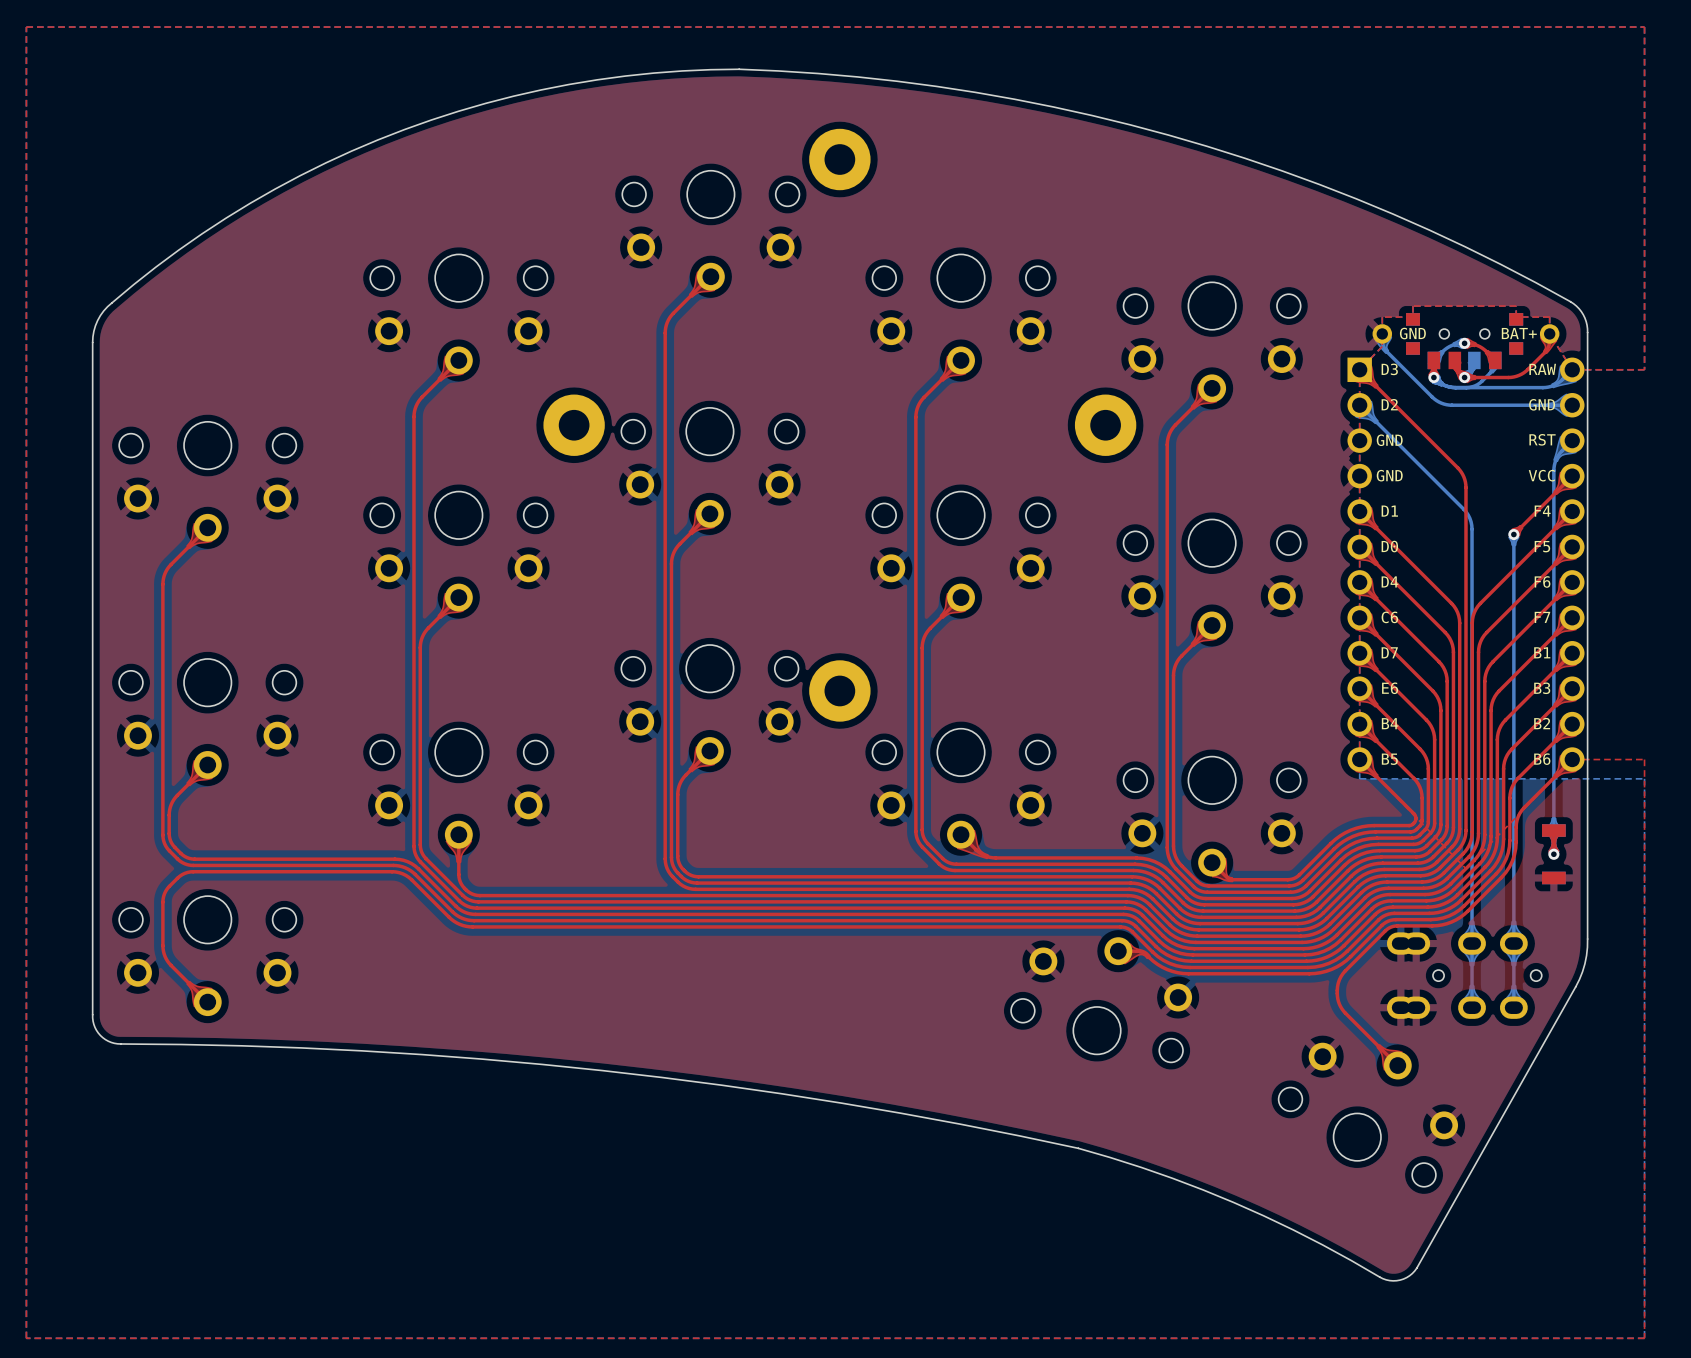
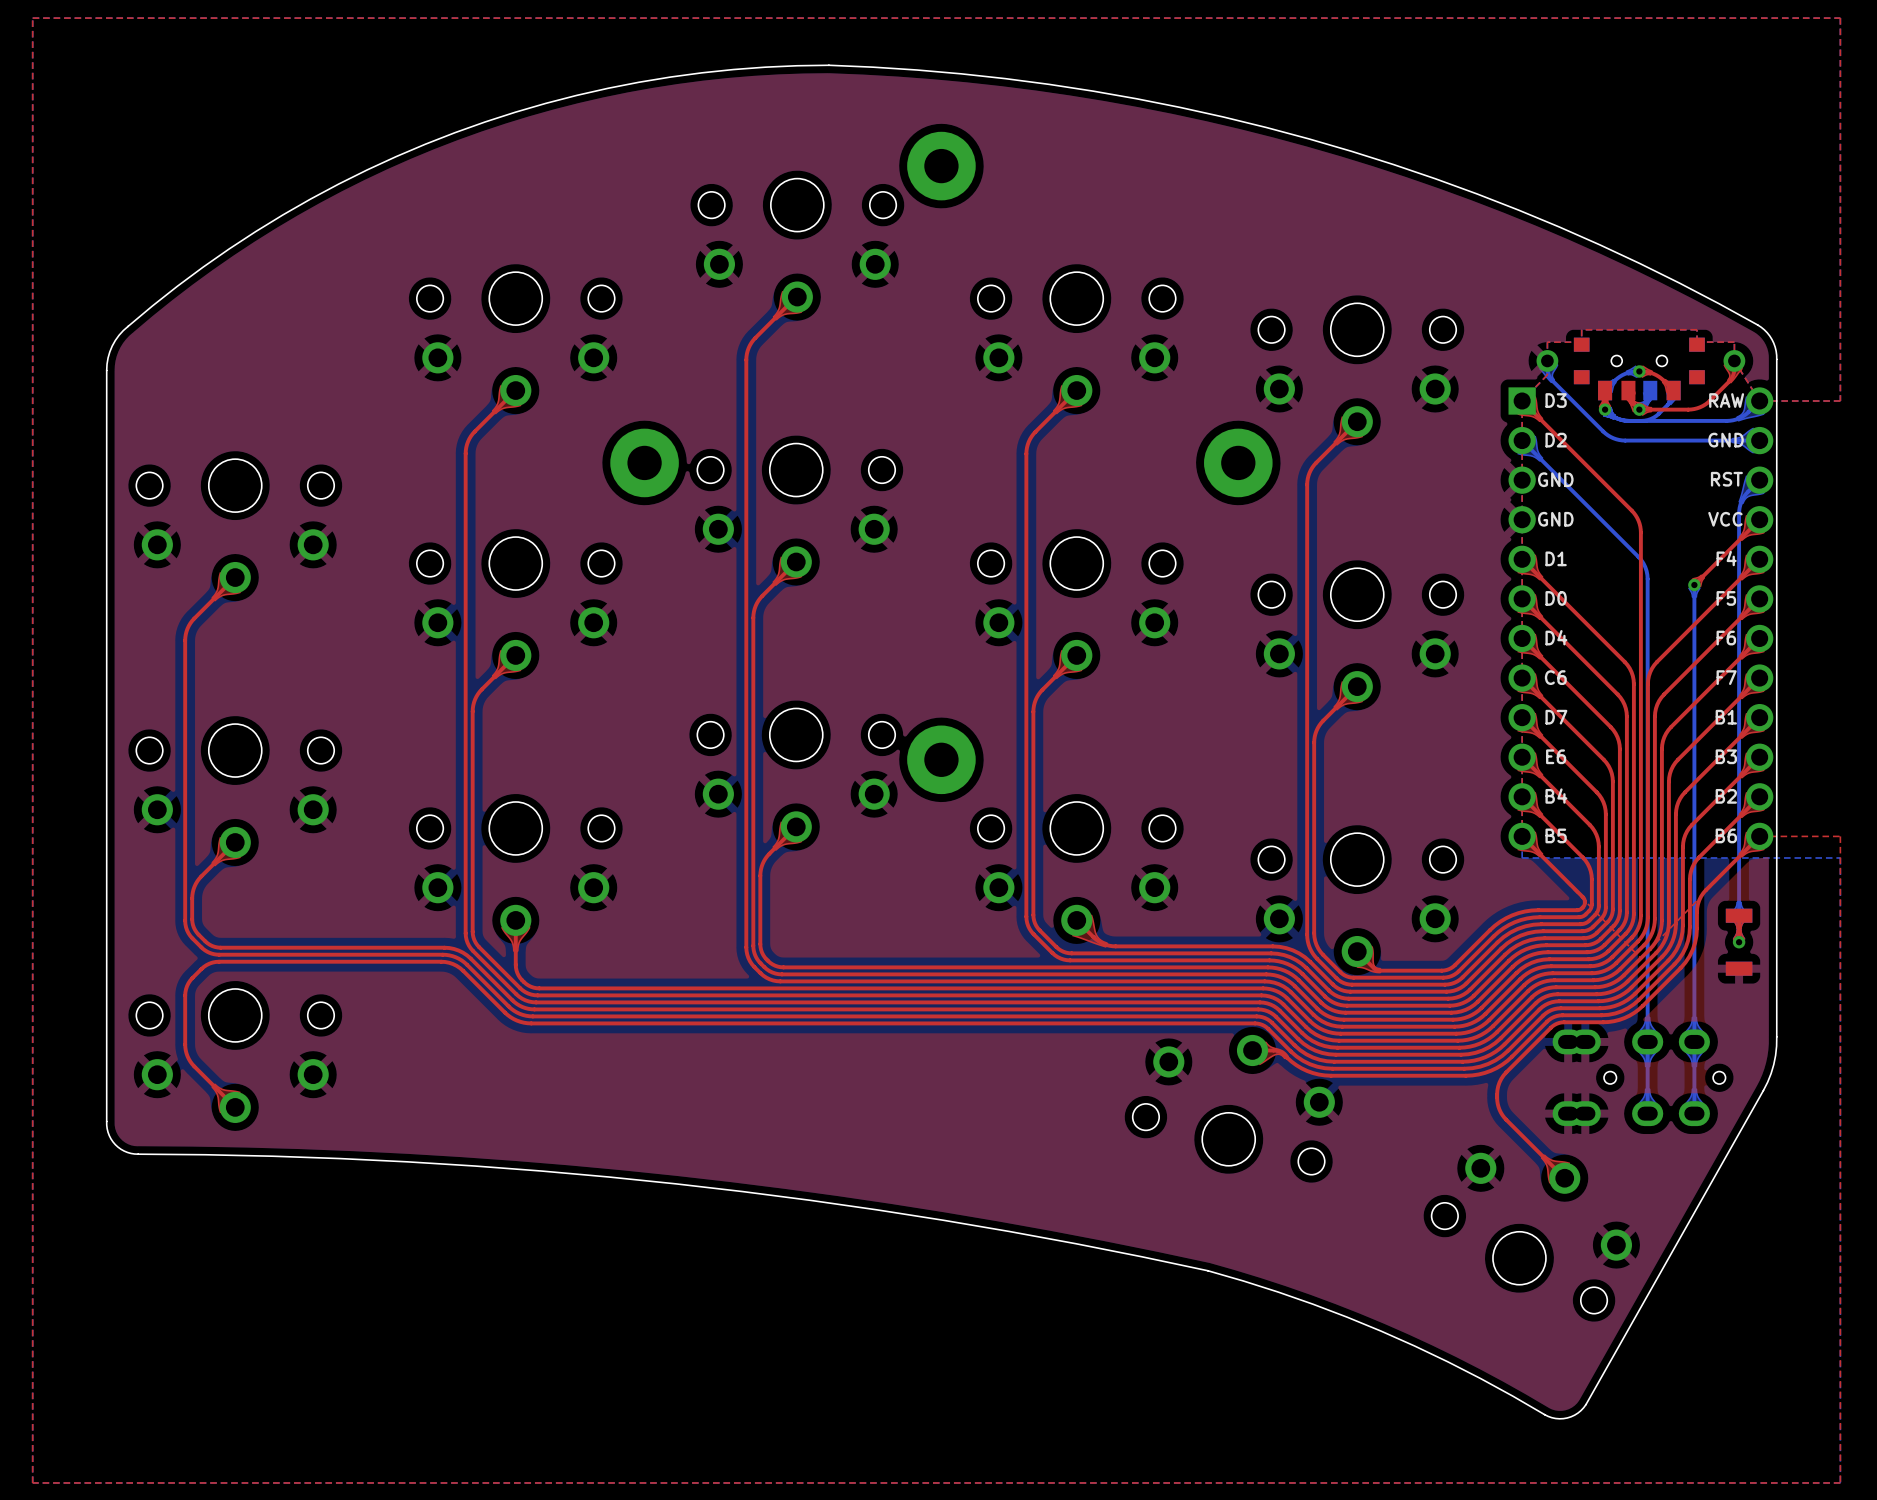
text: GND (1412, 333) -> none
text: BAT+ (1519, 333) -> none

